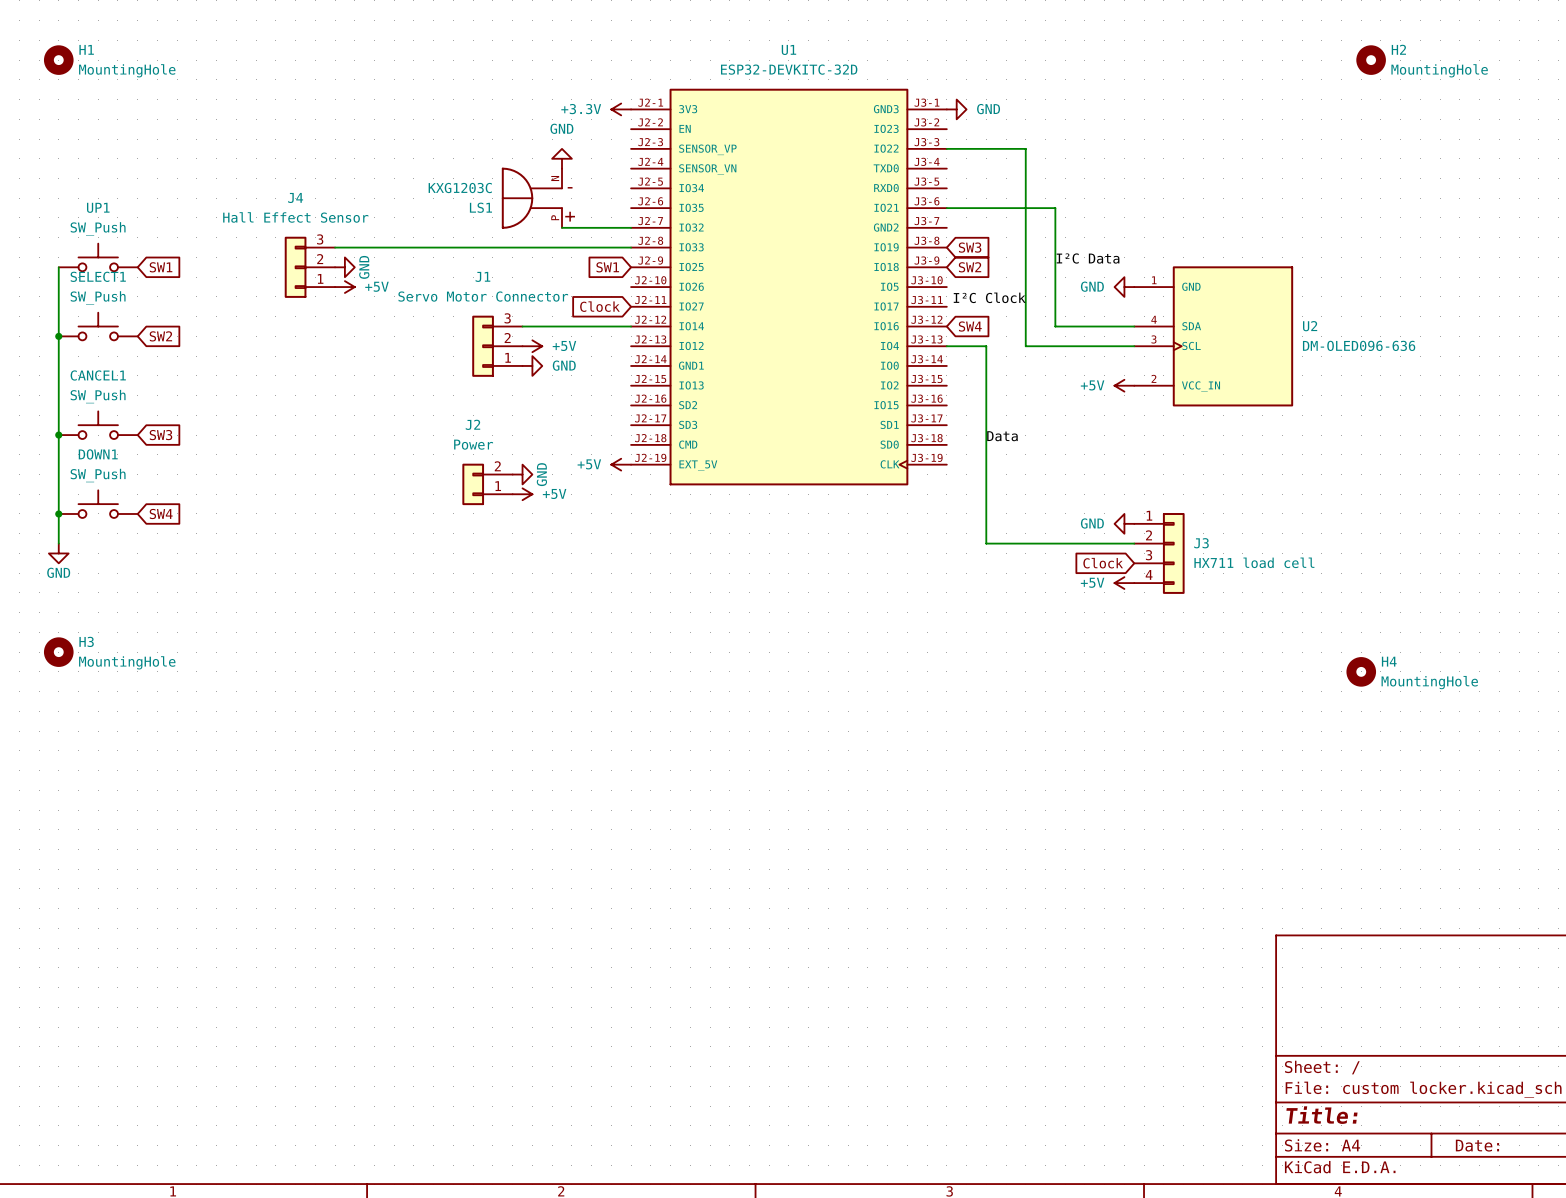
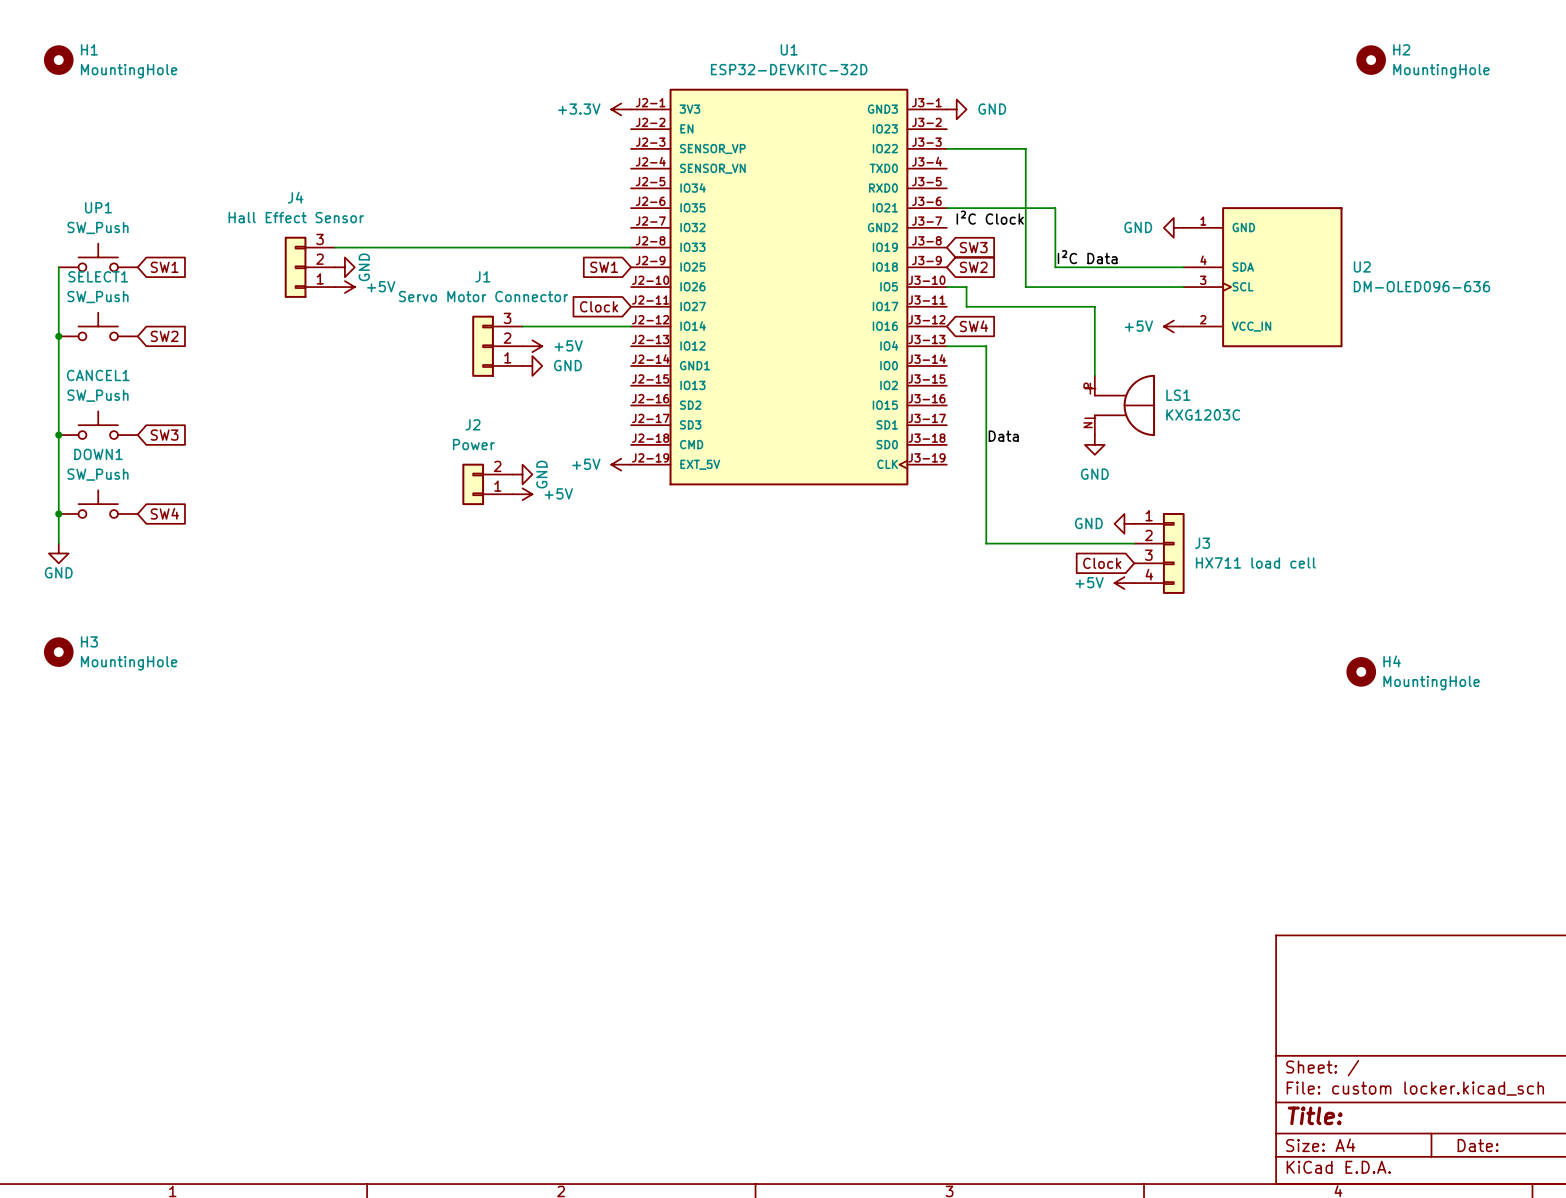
power symbol: GND (562, 158) -> none
LS1 rotation: 0° (532, 198) -> 180° (1124, 405)
LS1 position: (532, 198) -> (1124, 405)
wire: (562, 227) (631, 227) -> none
wire: (1055, 267) (1055, 326) (1134, 326) -> (1055, 267) (1183, 267)
wire: none -> (946, 287) (966, 287) (966, 306) (1094, 306) (1094, 375)
wire: (1025, 287) (1025, 346) (1134, 346) -> (1025, 287) (1183, 287)
power symbol position: GND (1124, 287) -> GND (1173, 227)
label position: I²C Clock (989, 297) -> I²C Clock (990, 217)
U2 position: (1213, 336) -> (1263, 277)
power symbol position: +5V (1124, 385) -> +5V (1173, 326)
power symbol: none -> GND (1094, 444)

